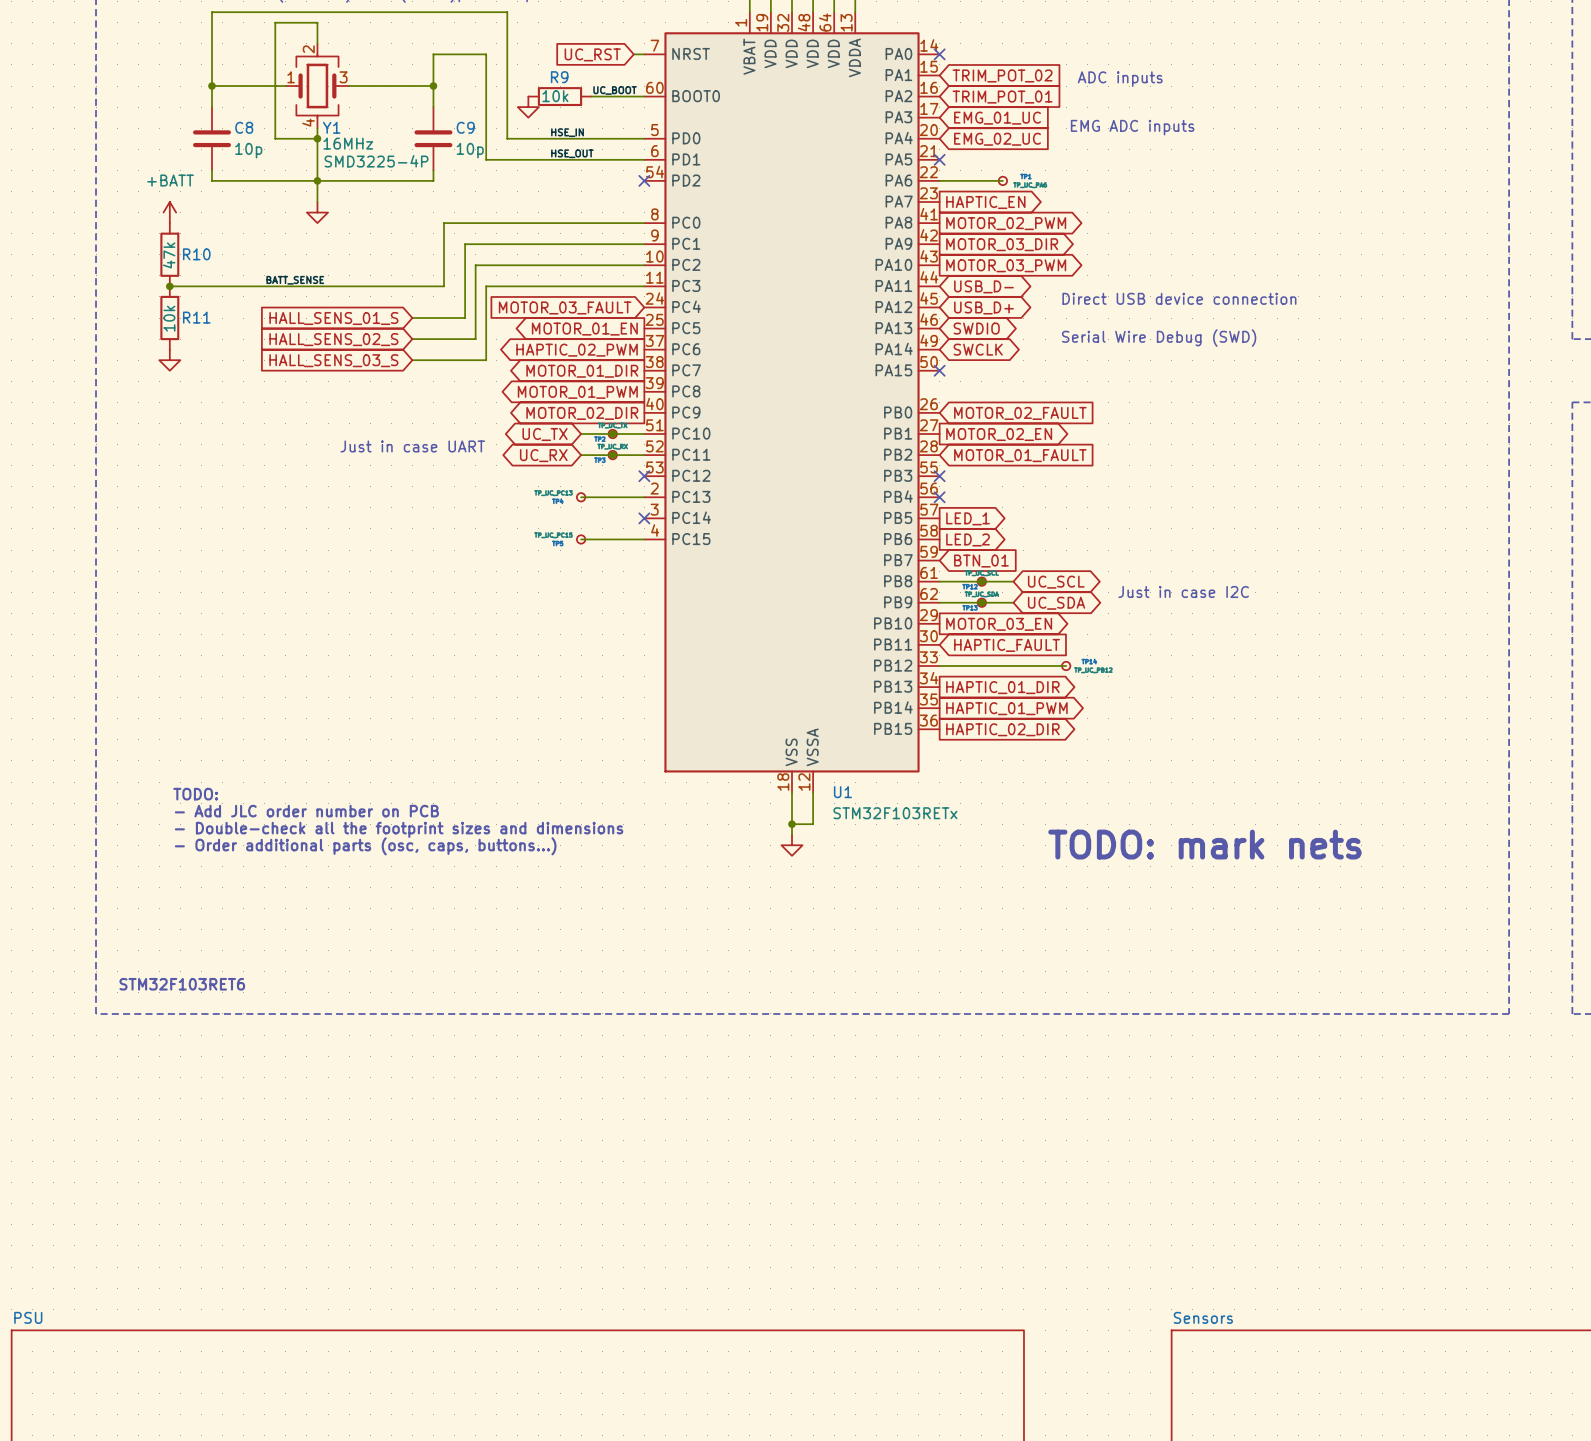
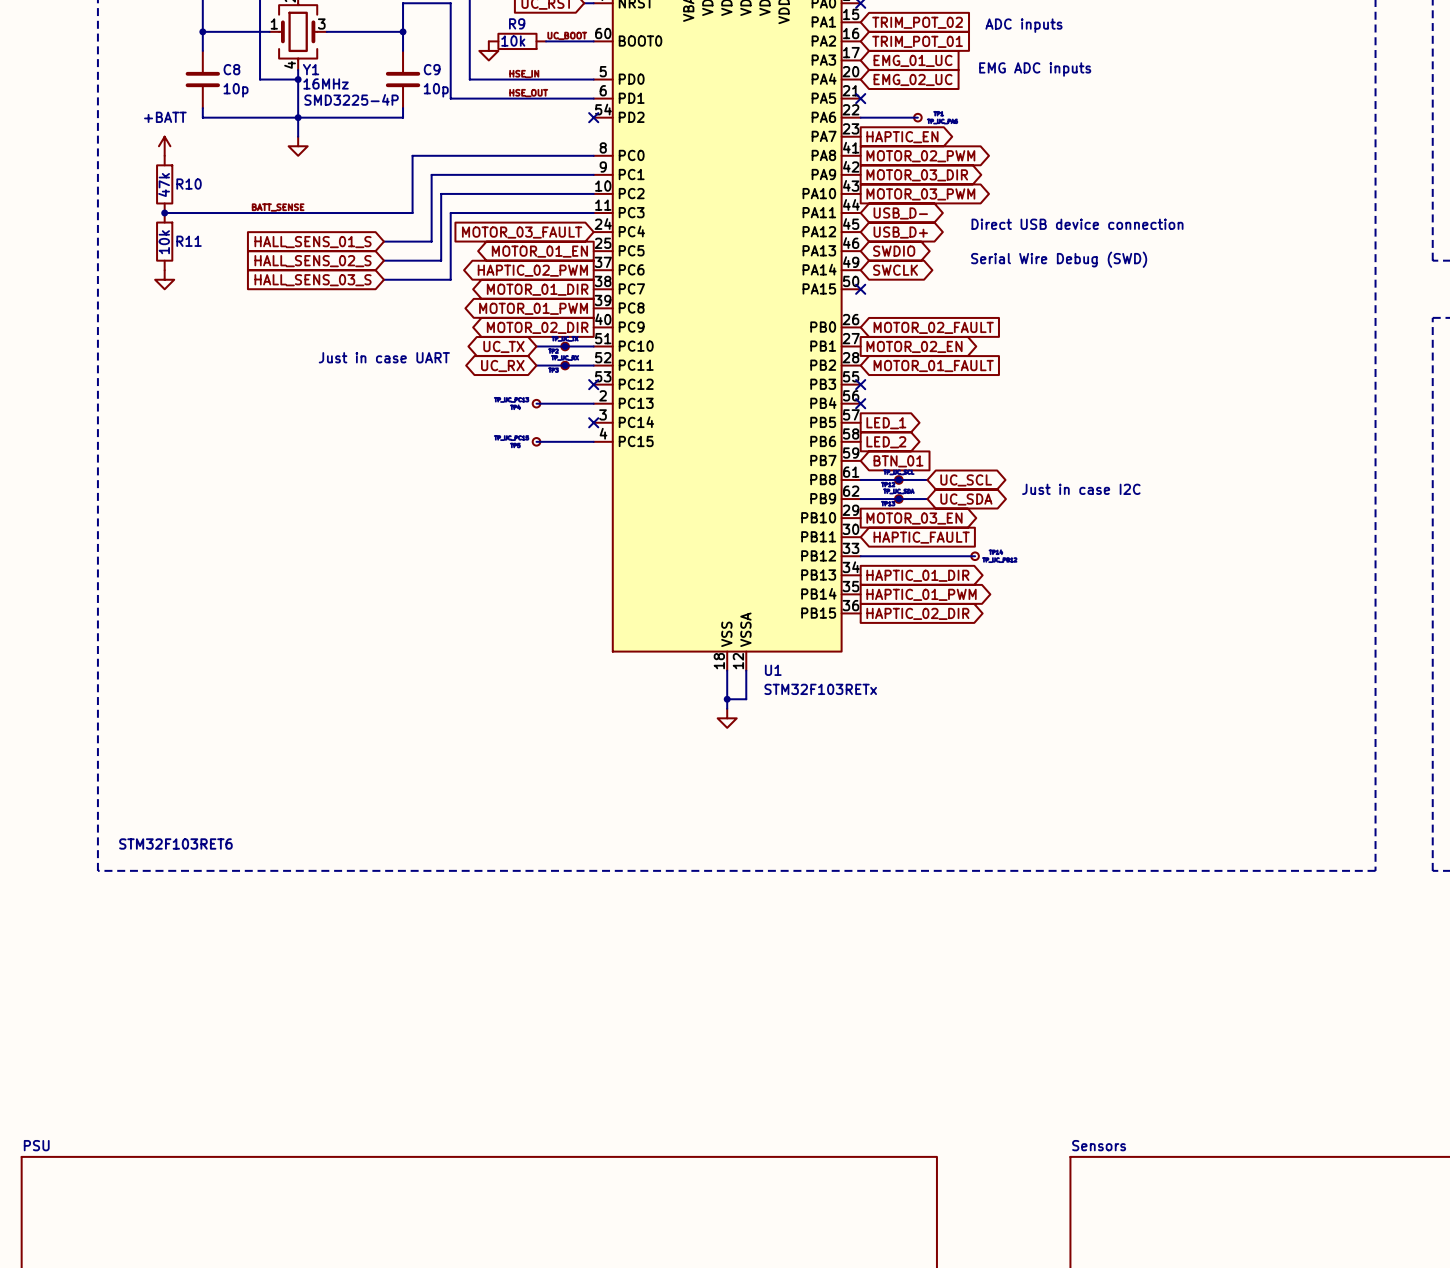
text: TODO: (195, 794) -> none
text: - Add JLC order number on PCB (306, 811) -> none
text: - Double-check all the footprint sizes and dimensions (399, 829) -> none
text: TODO: mark nets (1204, 844) -> none
text: - Order additional parts (osc, caps, buttons...) (365, 846) -> none

